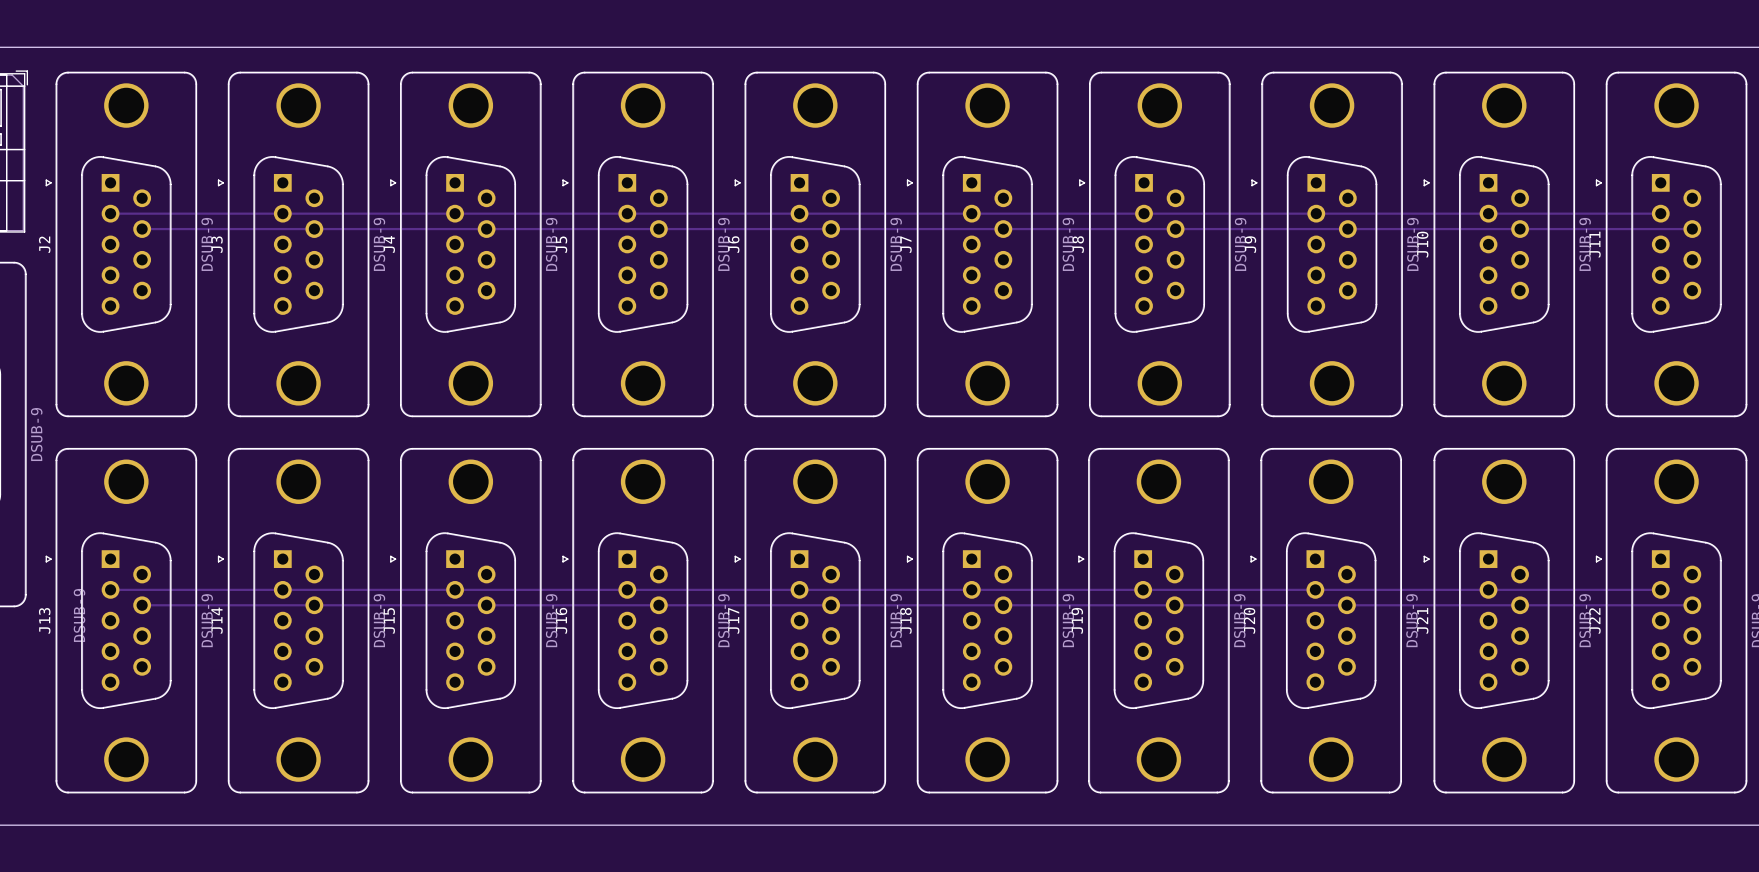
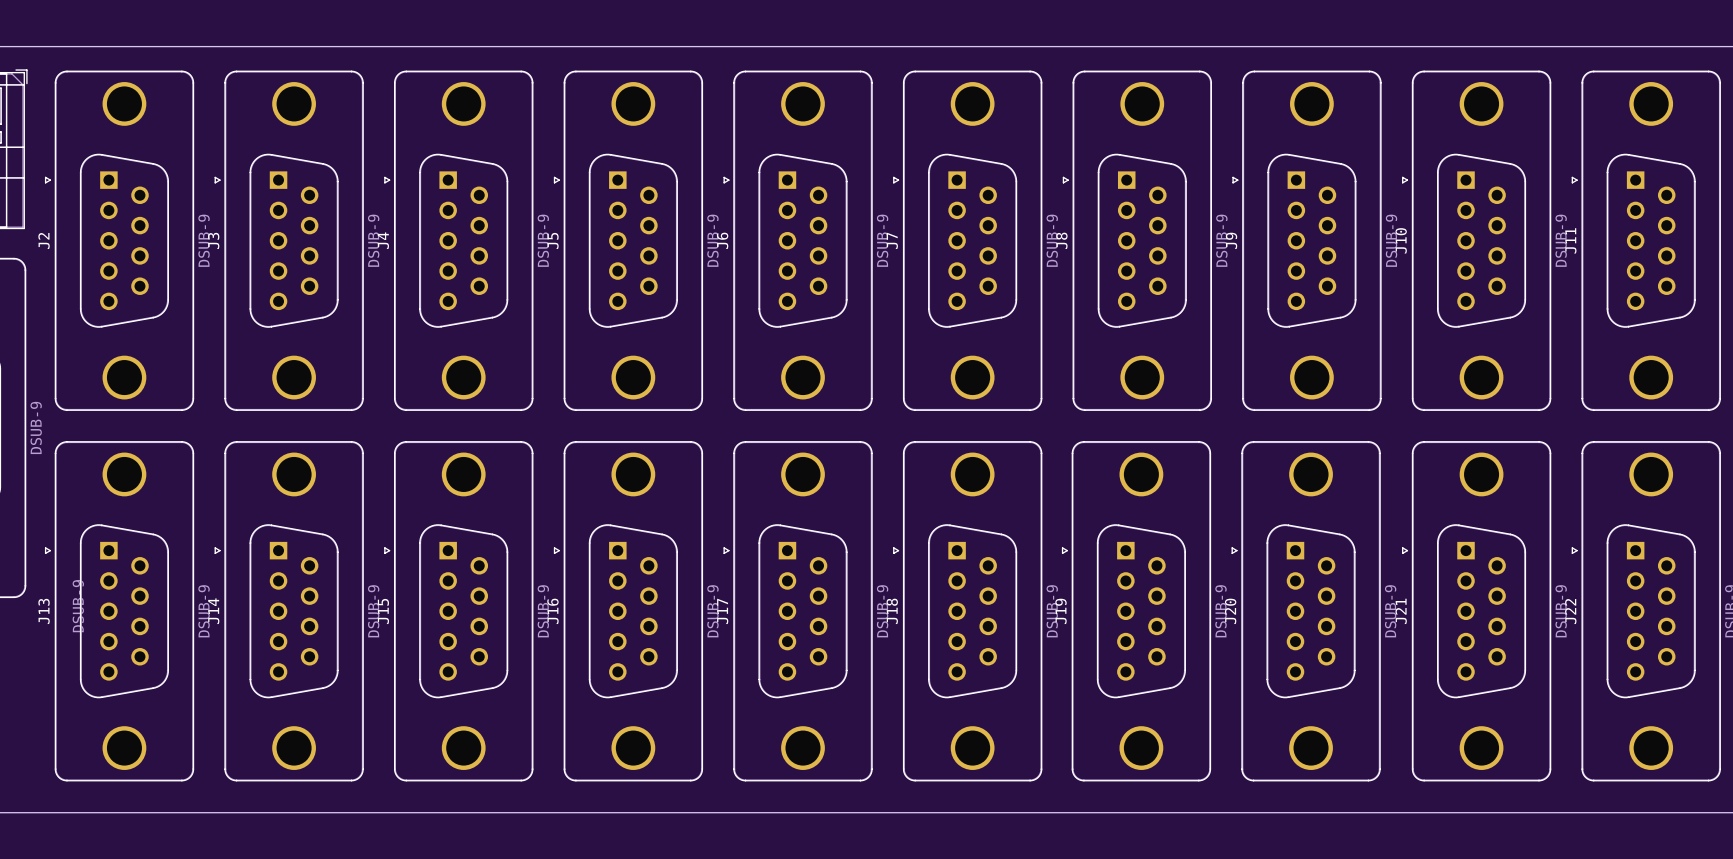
track: (110, 213) (1660, 213) -> none
track: (142, 229) (1692, 229) -> none
track: (110, 589) (1660, 589) -> none
track: (142, 605) (1692, 605) -> none

